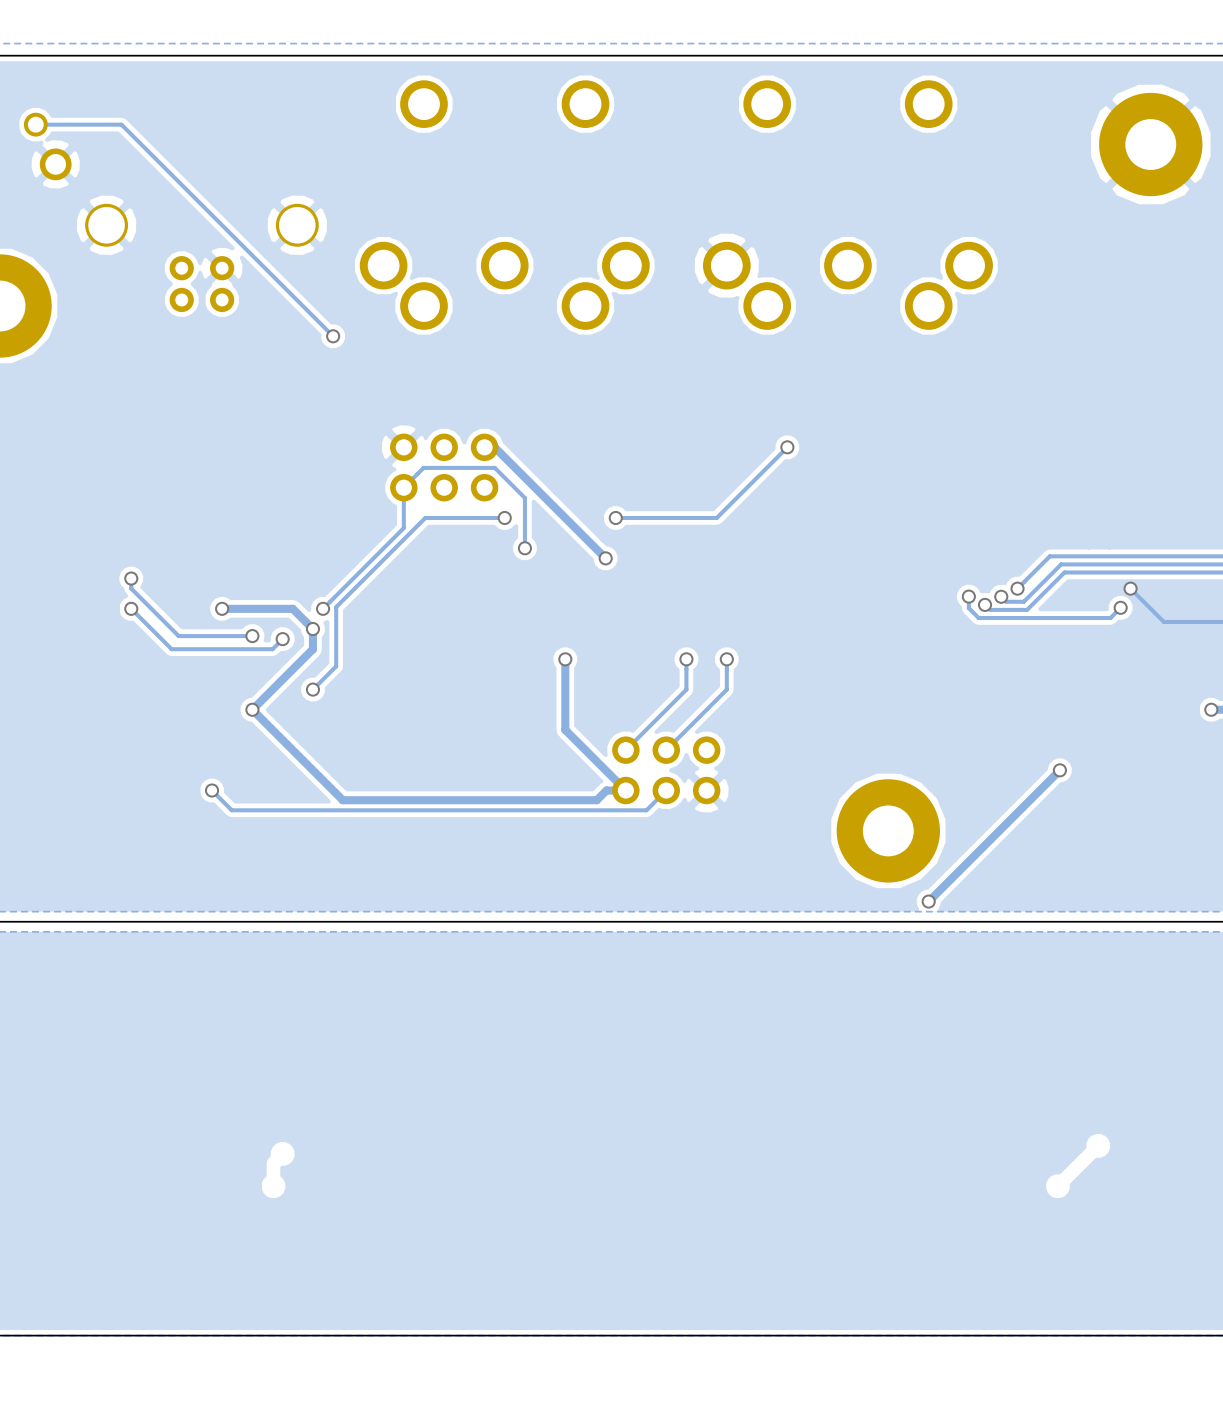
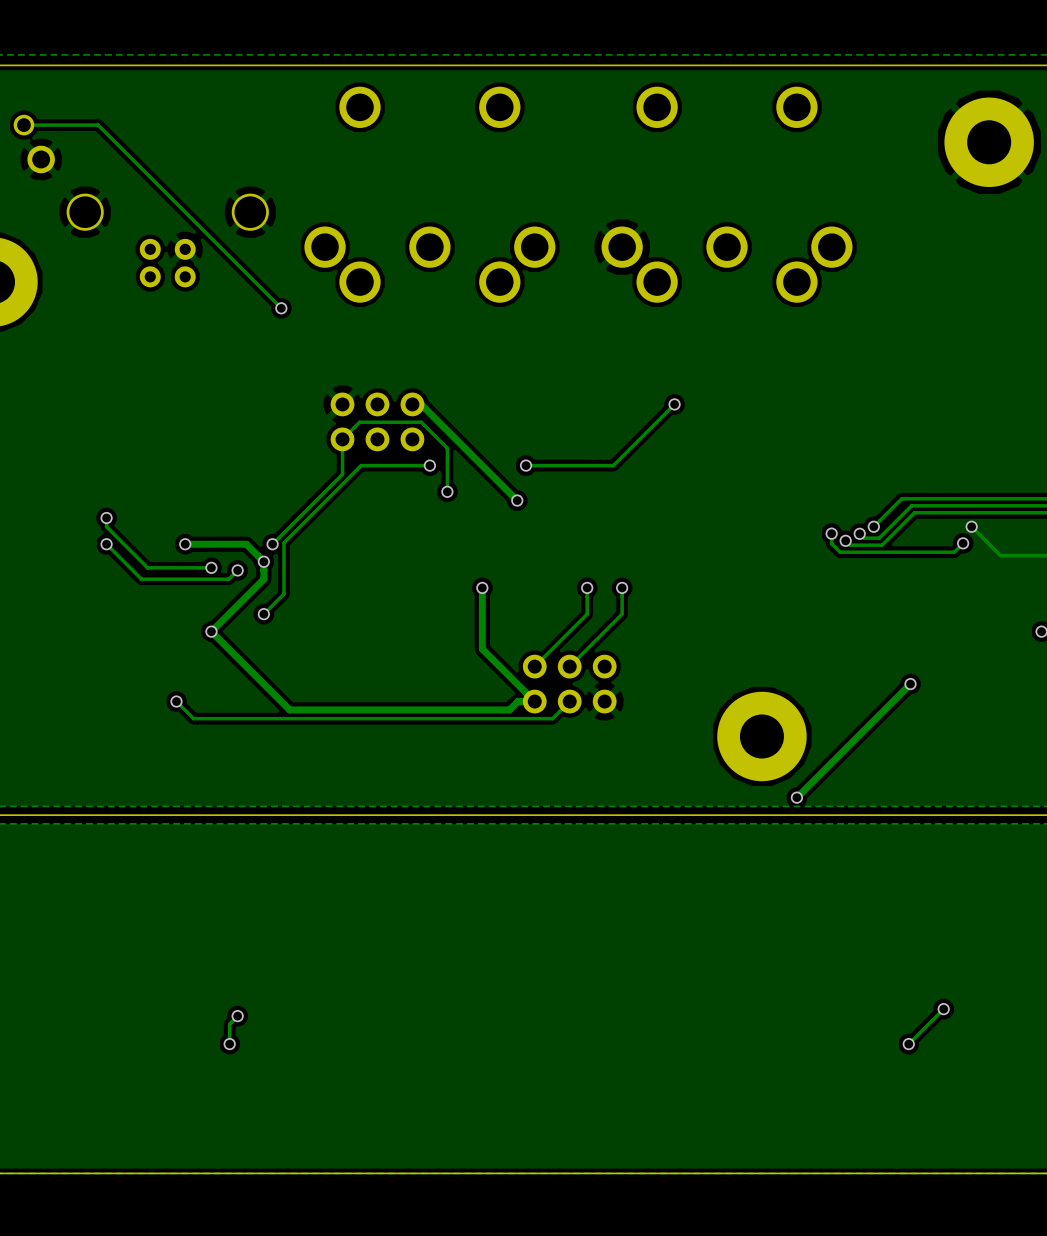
track: none -> (943, 1009) (908, 1044)
via: none -> (943, 1009)
track: none -> (237, 1016) (229, 1024) (229, 1044)
via: none -> (237, 1016)
via: none -> (229, 1044)
via: none -> (908, 1044)

